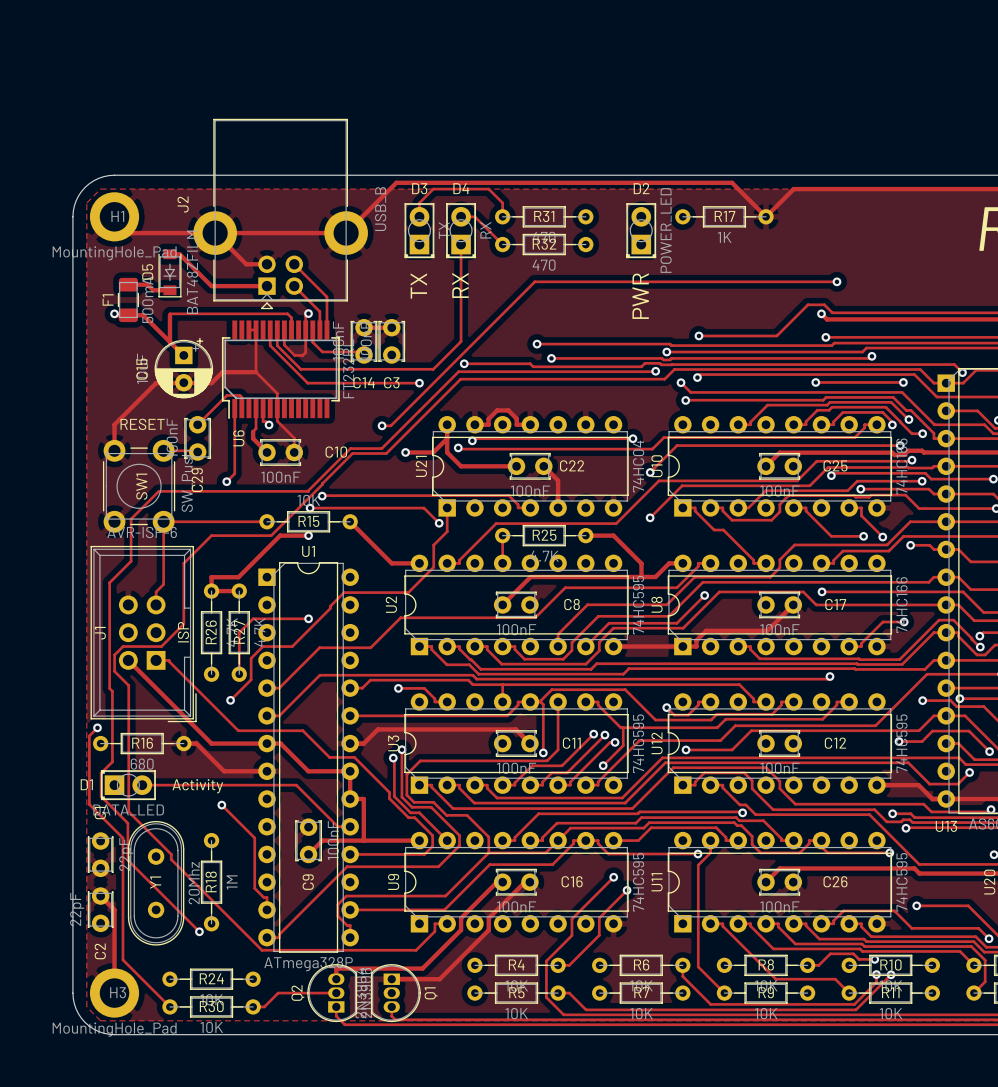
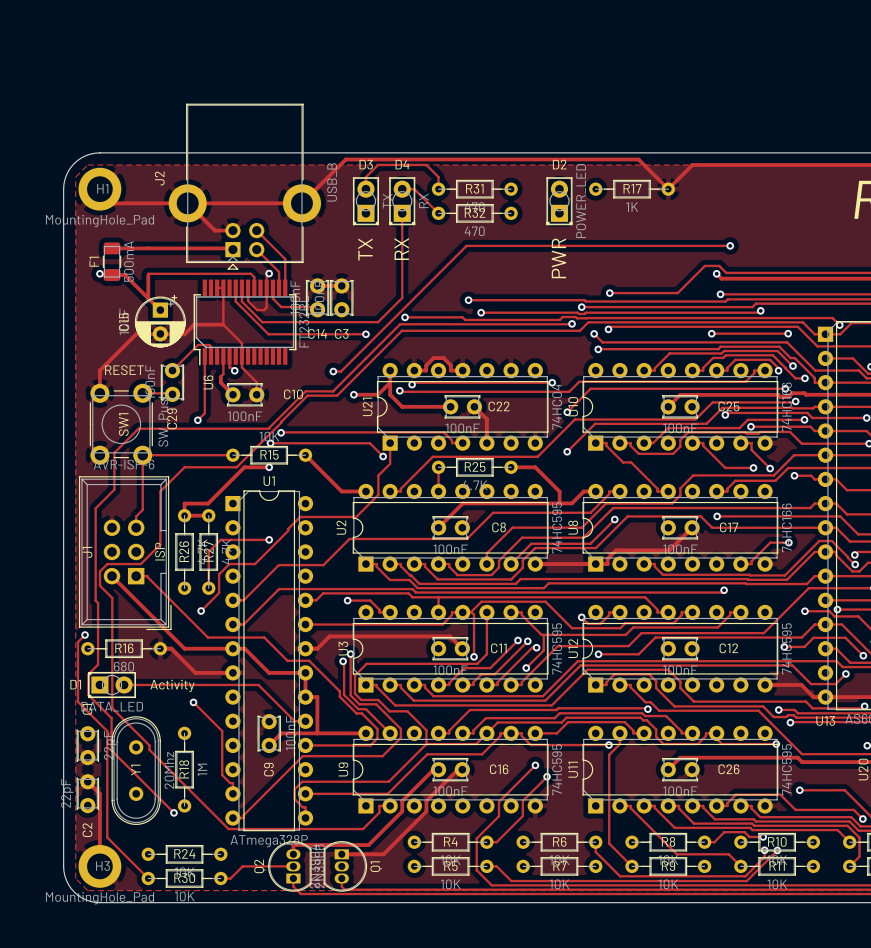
track: (169, 254) (179, 254) (211, 286) (267, 286) -> none
D5: BAT48ZFILM (169, 273) -> none
track: (147, 284) (153, 290) (169, 290) -> (128, 248) (231, 248)

